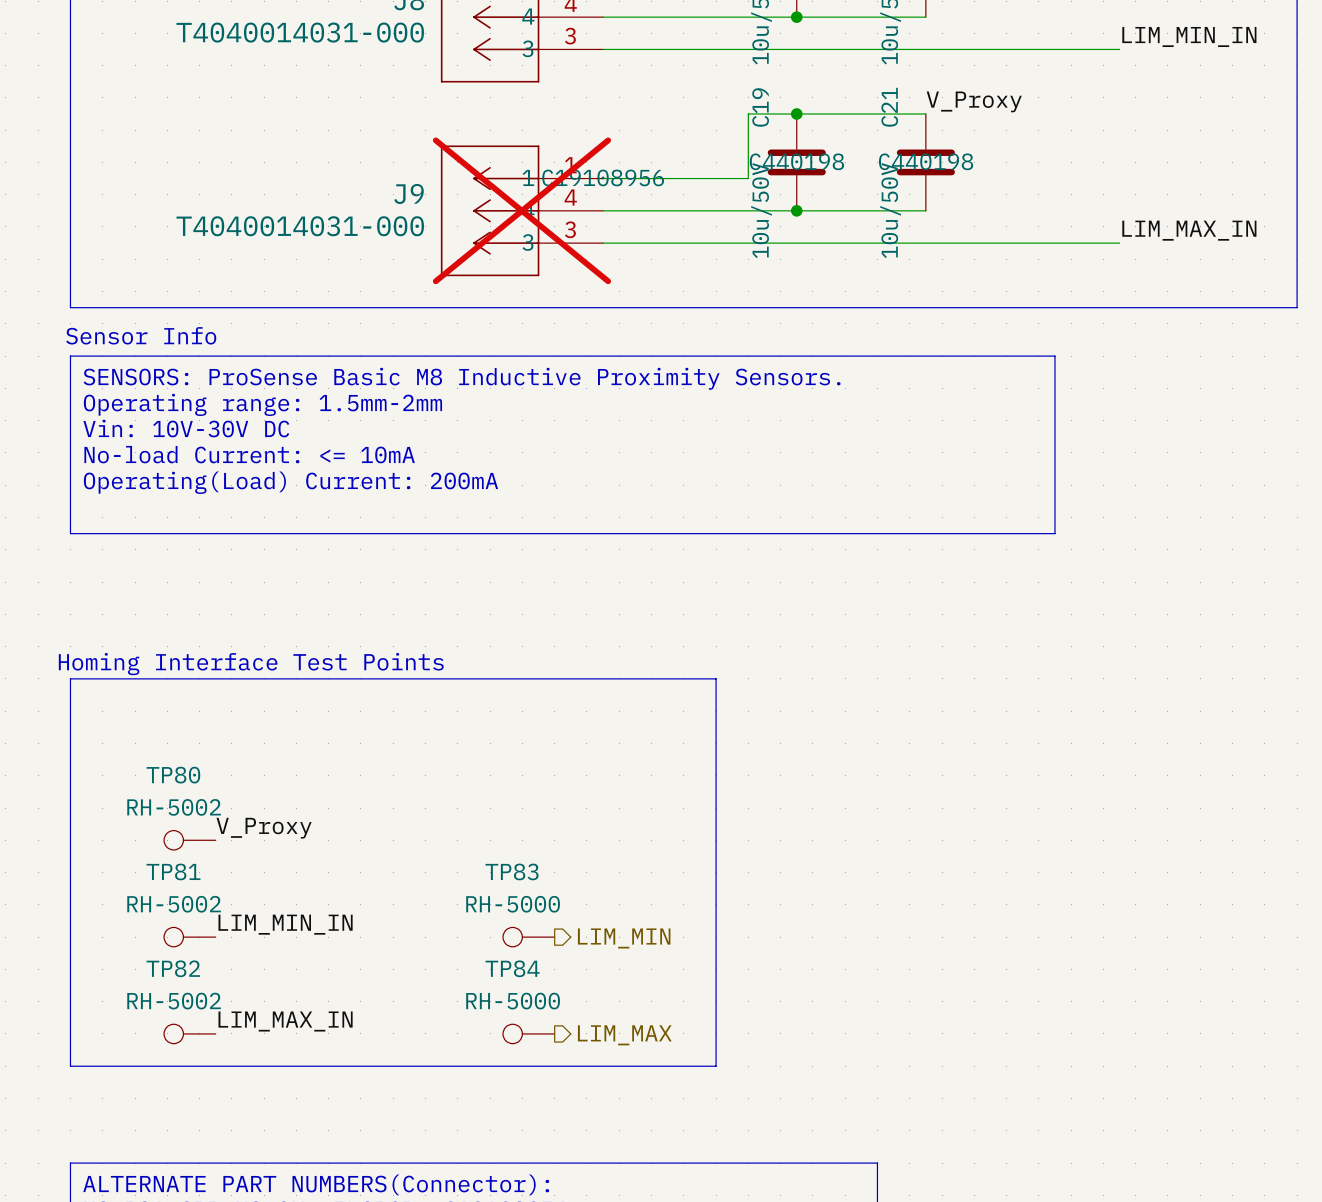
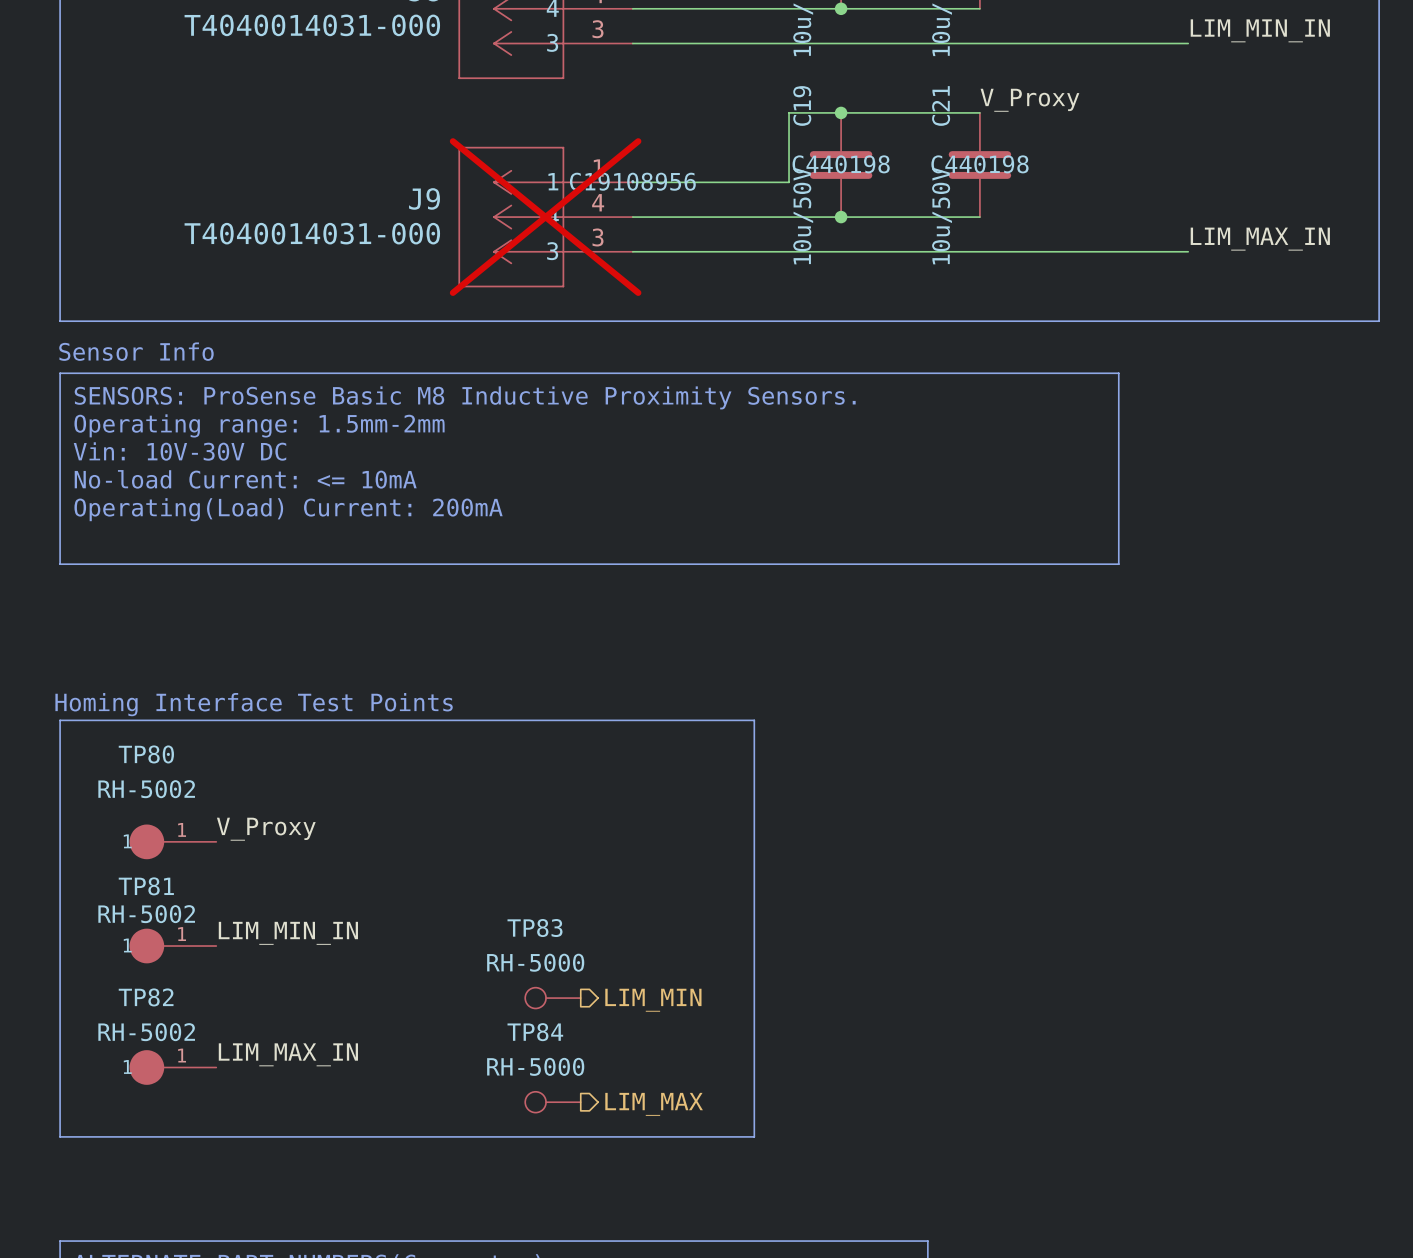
label position: V_Proxy (264, 828) -> V_Proxy (266, 829)
TP80 symbol: [164, 830, 216, 850] -> [129, 824, 217, 860]
label position: LIM_MIN_IN (285, 924) -> LIM_MIN_IN (288, 933)
TP81 symbol: [164, 927, 216, 947] -> [129, 928, 217, 964]
label position: LIM_MAX_IN (285, 1021) -> LIM_MAX_IN (288, 1054)
TP82 symbol: [164, 1024, 216, 1044] -> [129, 1050, 217, 1085]

